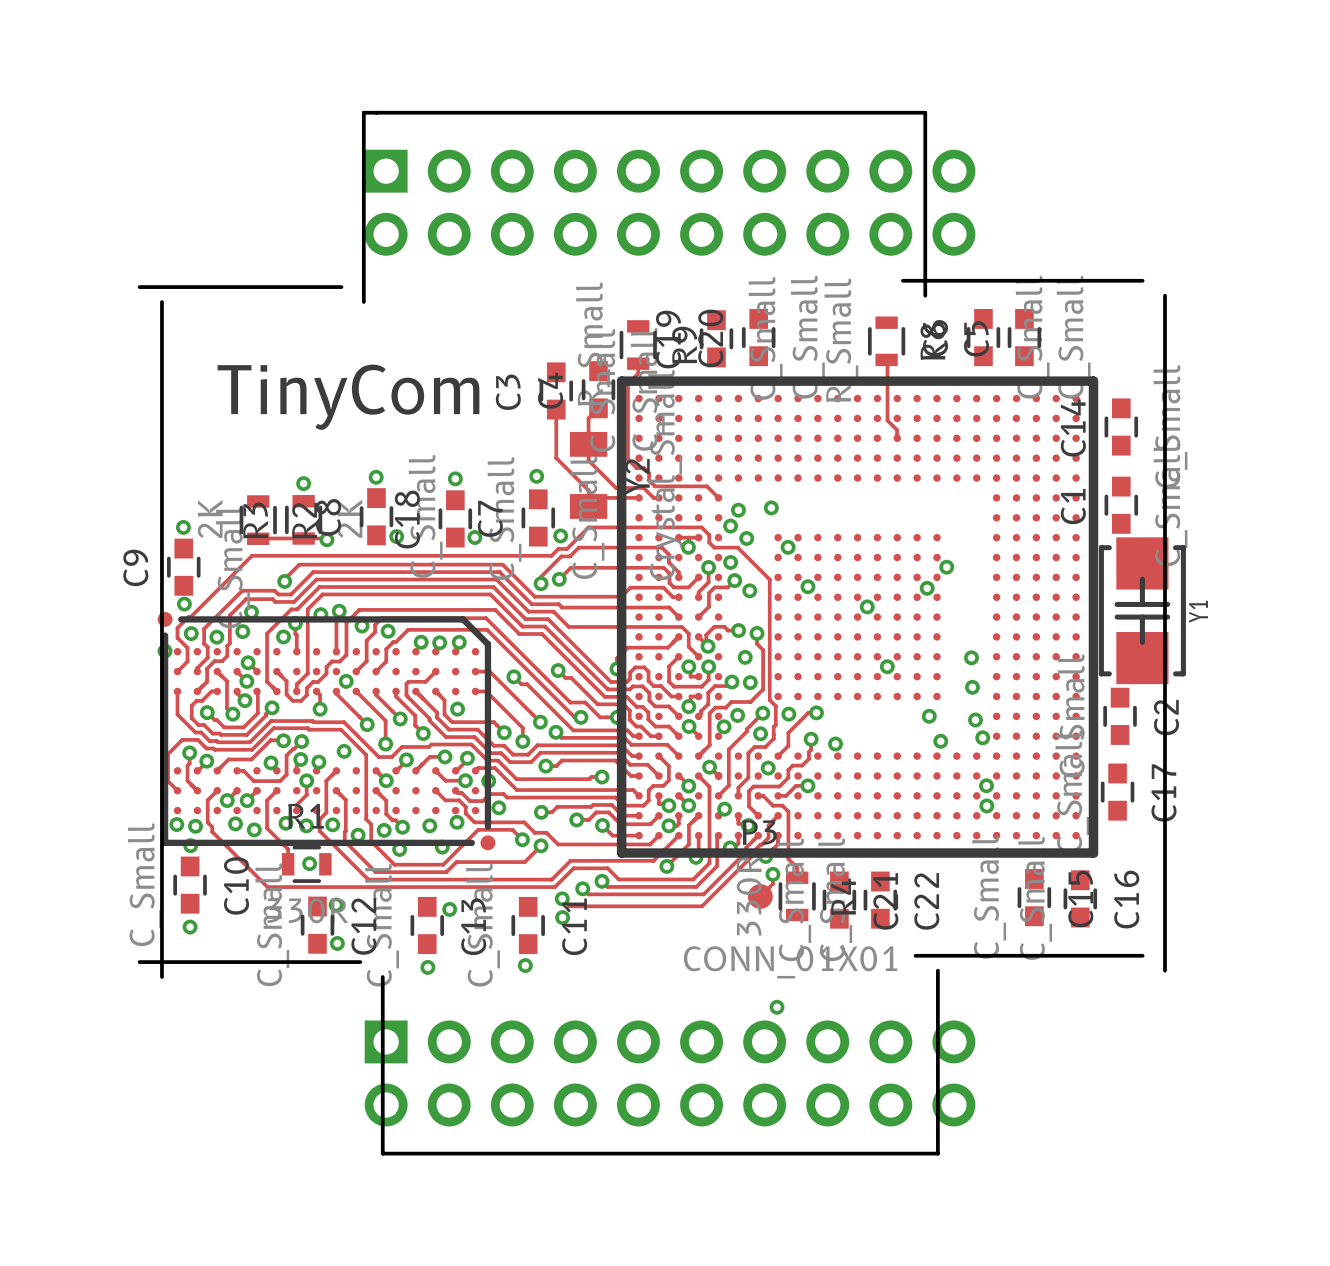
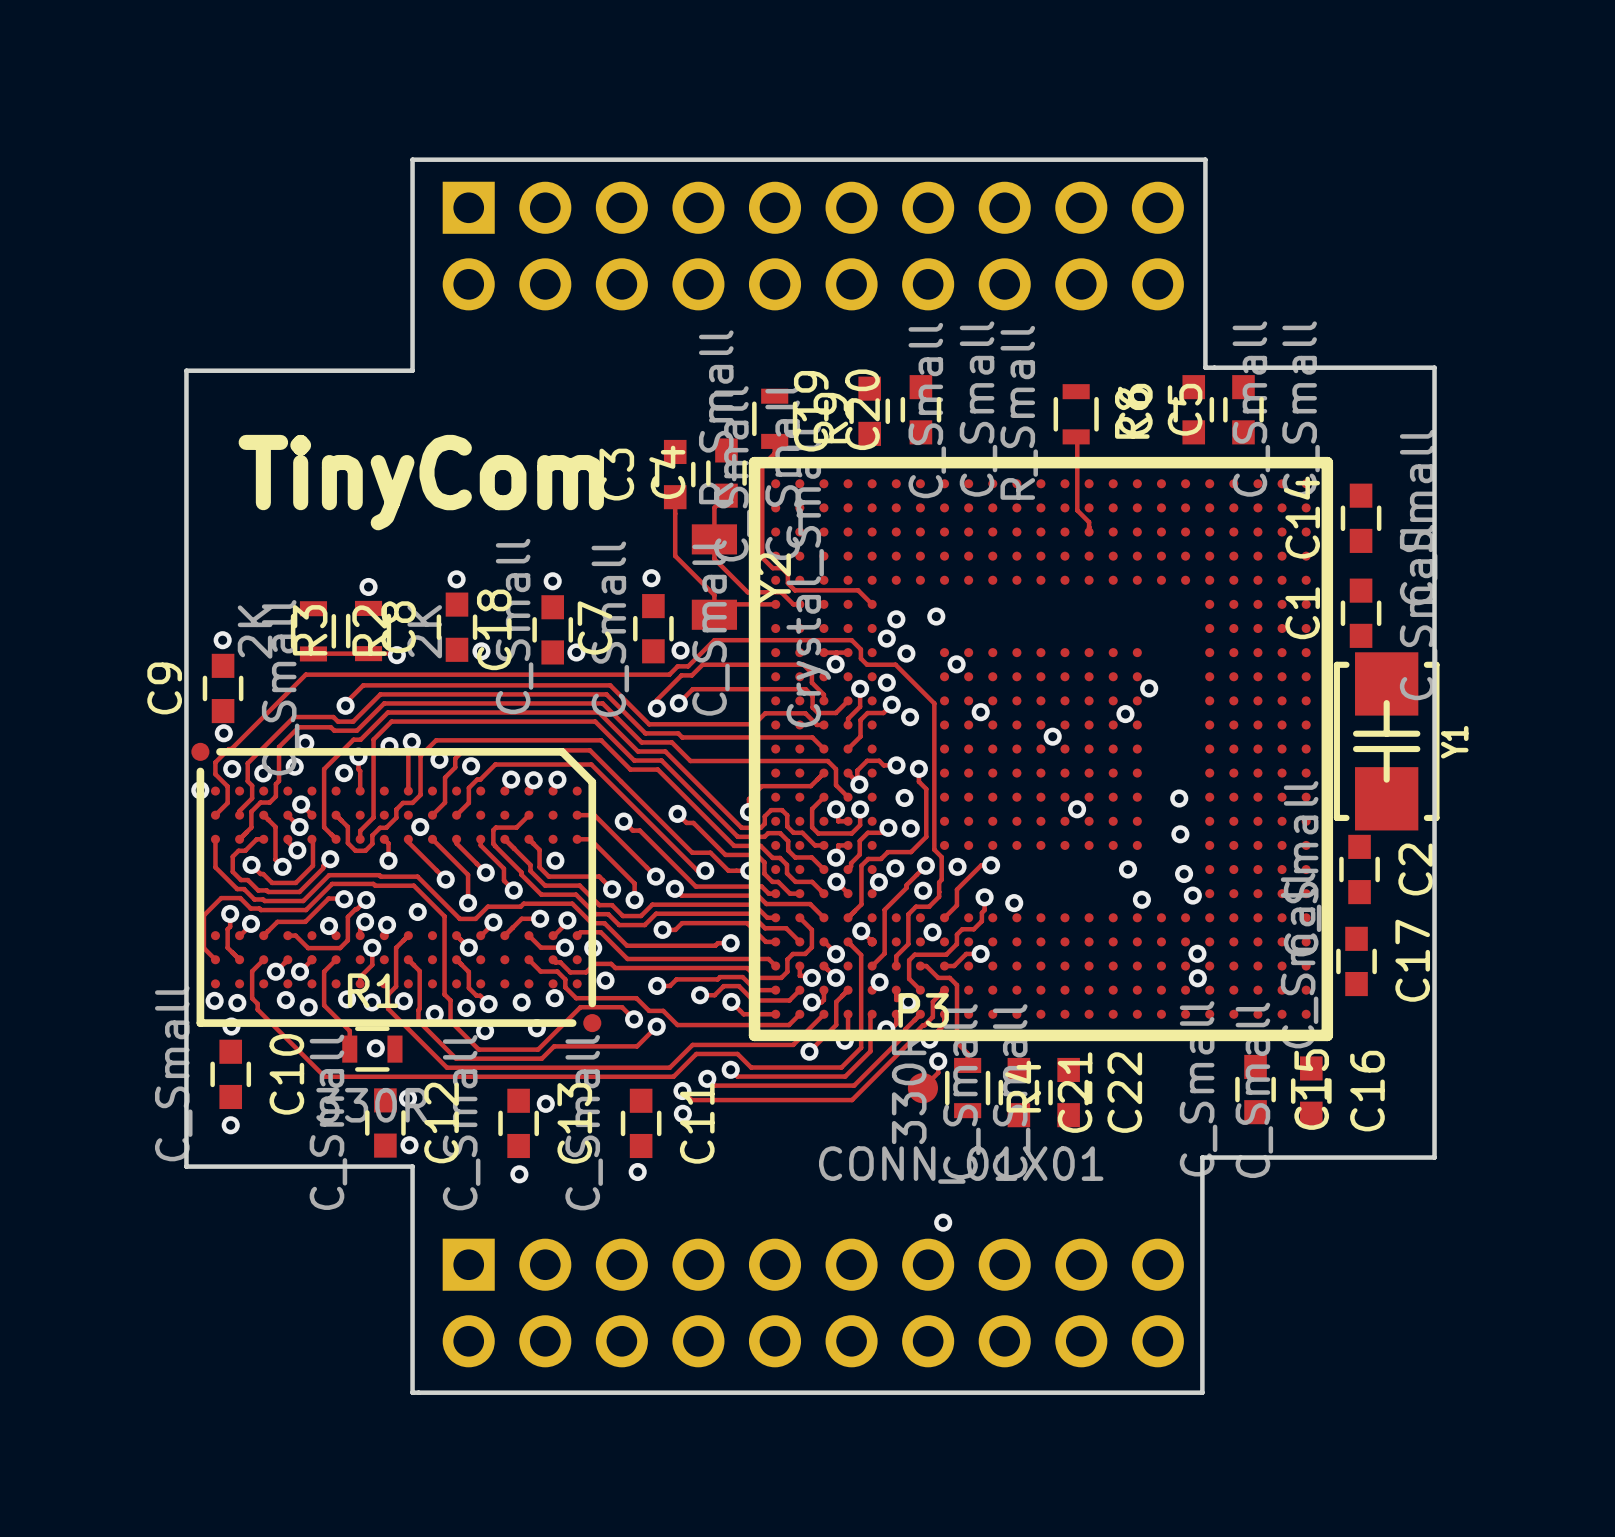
board edge: none -> (412, 159) (412, 370) (186, 370) (186, 1166) (412, 1166) (412, 1392) (1202, 1392) (1202, 1157) (1434, 1157) (1434, 367) (1205, 367) (1205, 159) (412, 159)
board edge: (902, 280) (1142, 280) -> none
board edge: (139, 287) (341, 287) -> none
board edge: (925, 295) (925, 112) (363, 112) (363, 301) -> none
board edge: (1164, 295) (1164, 970) -> none
board edge: (161, 301) (161, 976) -> none
board edge: (915, 955) (1142, 955) -> none
board edge: (139, 962) (360, 962) -> none
board edge: (937, 970) (937, 1153) (382, 1153) (382, 976) -> none

